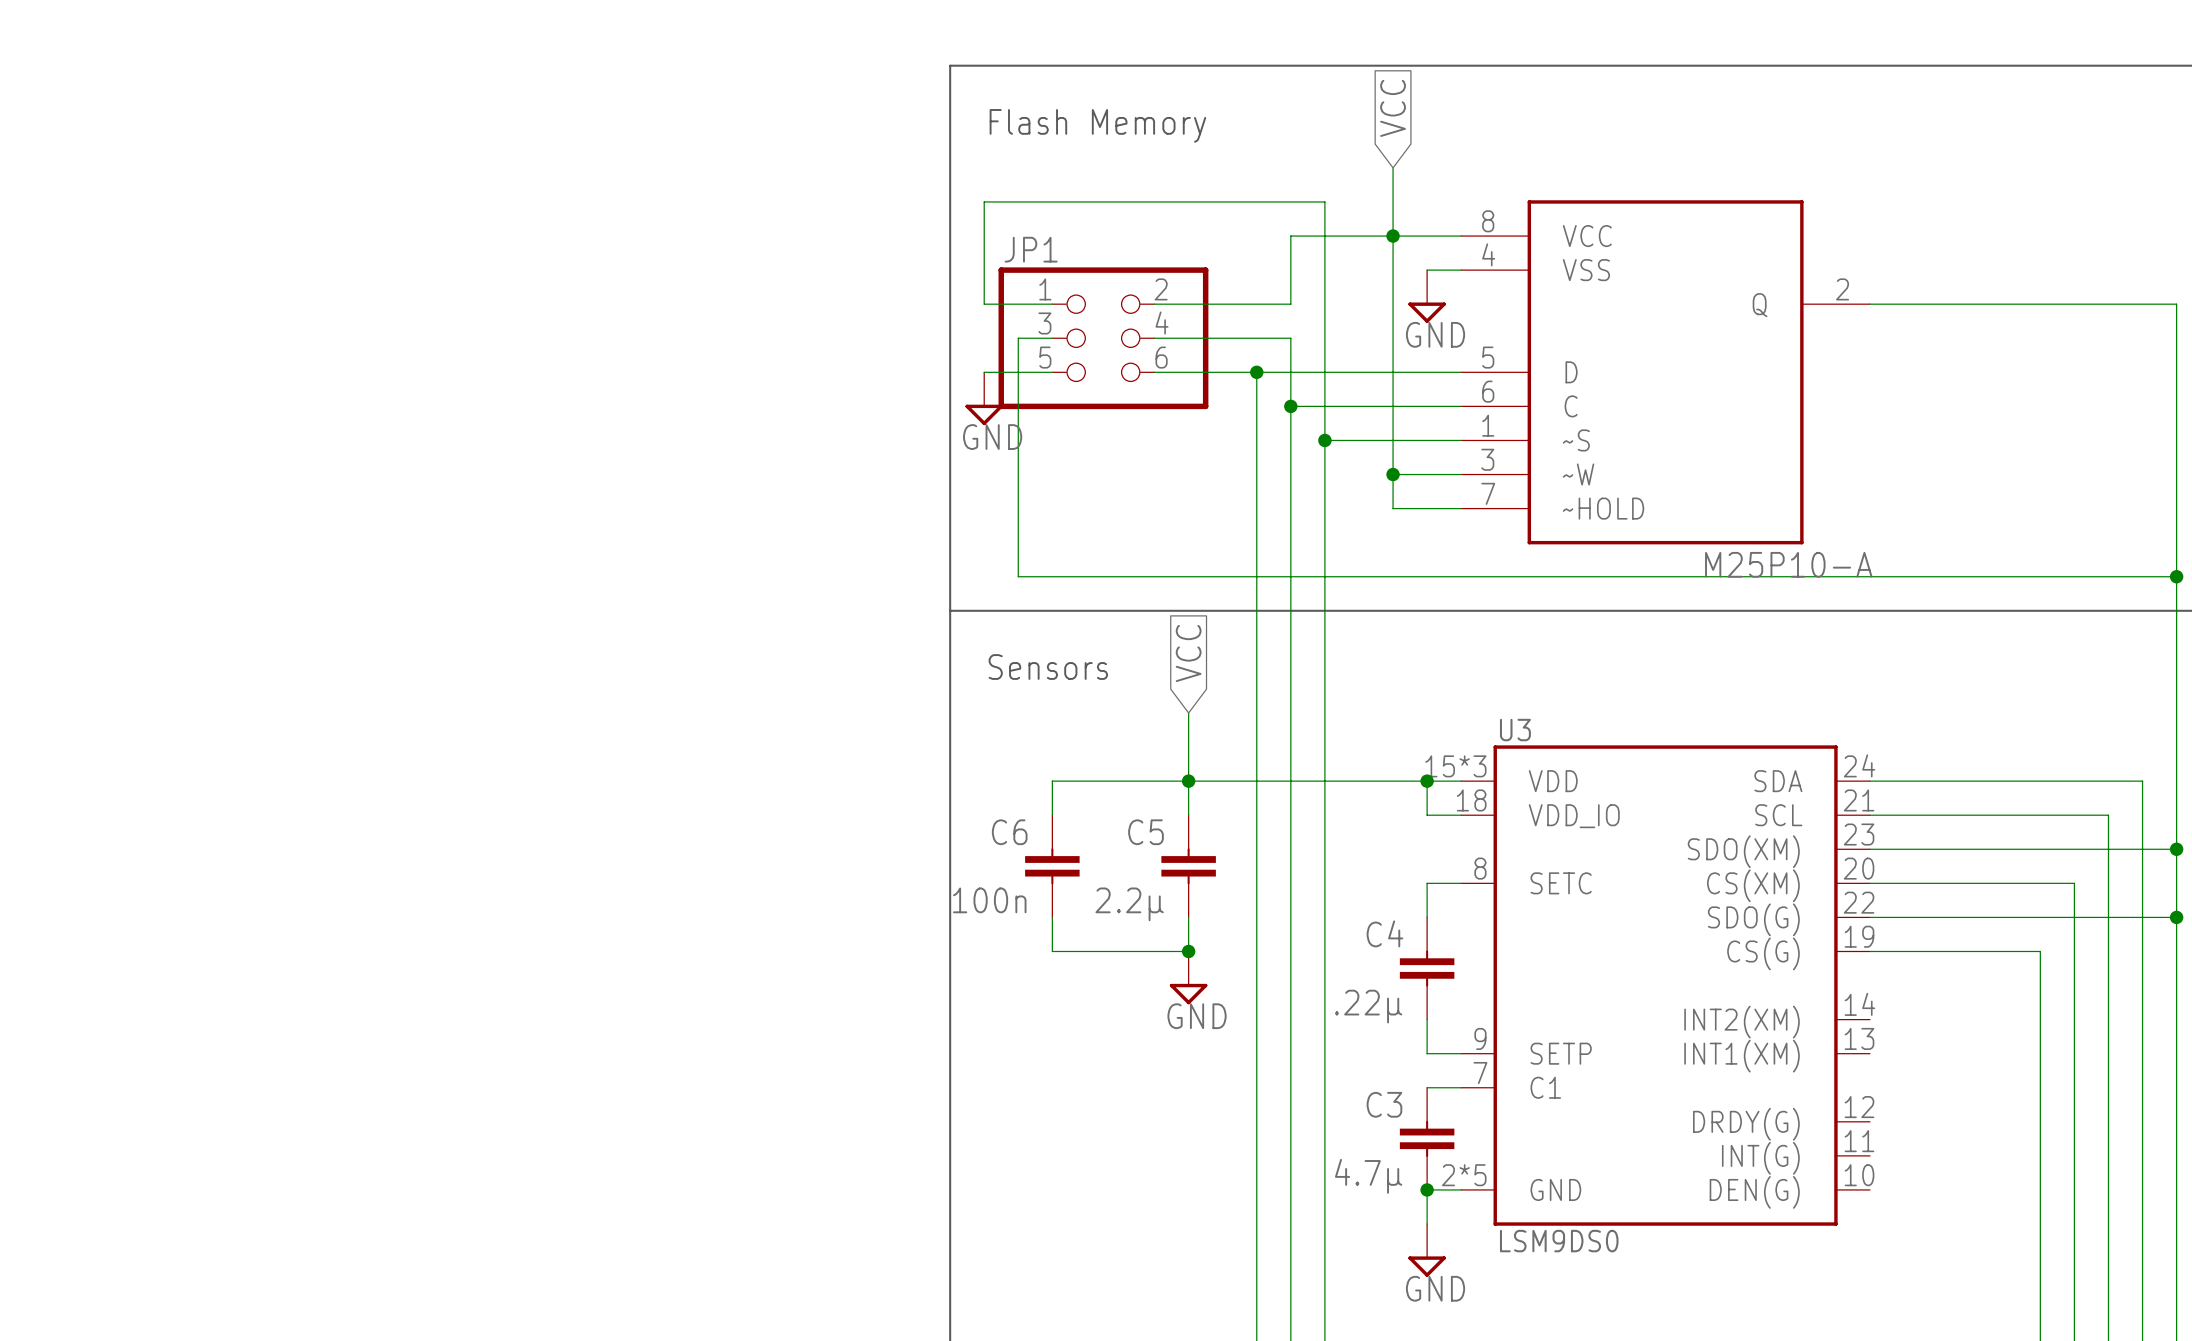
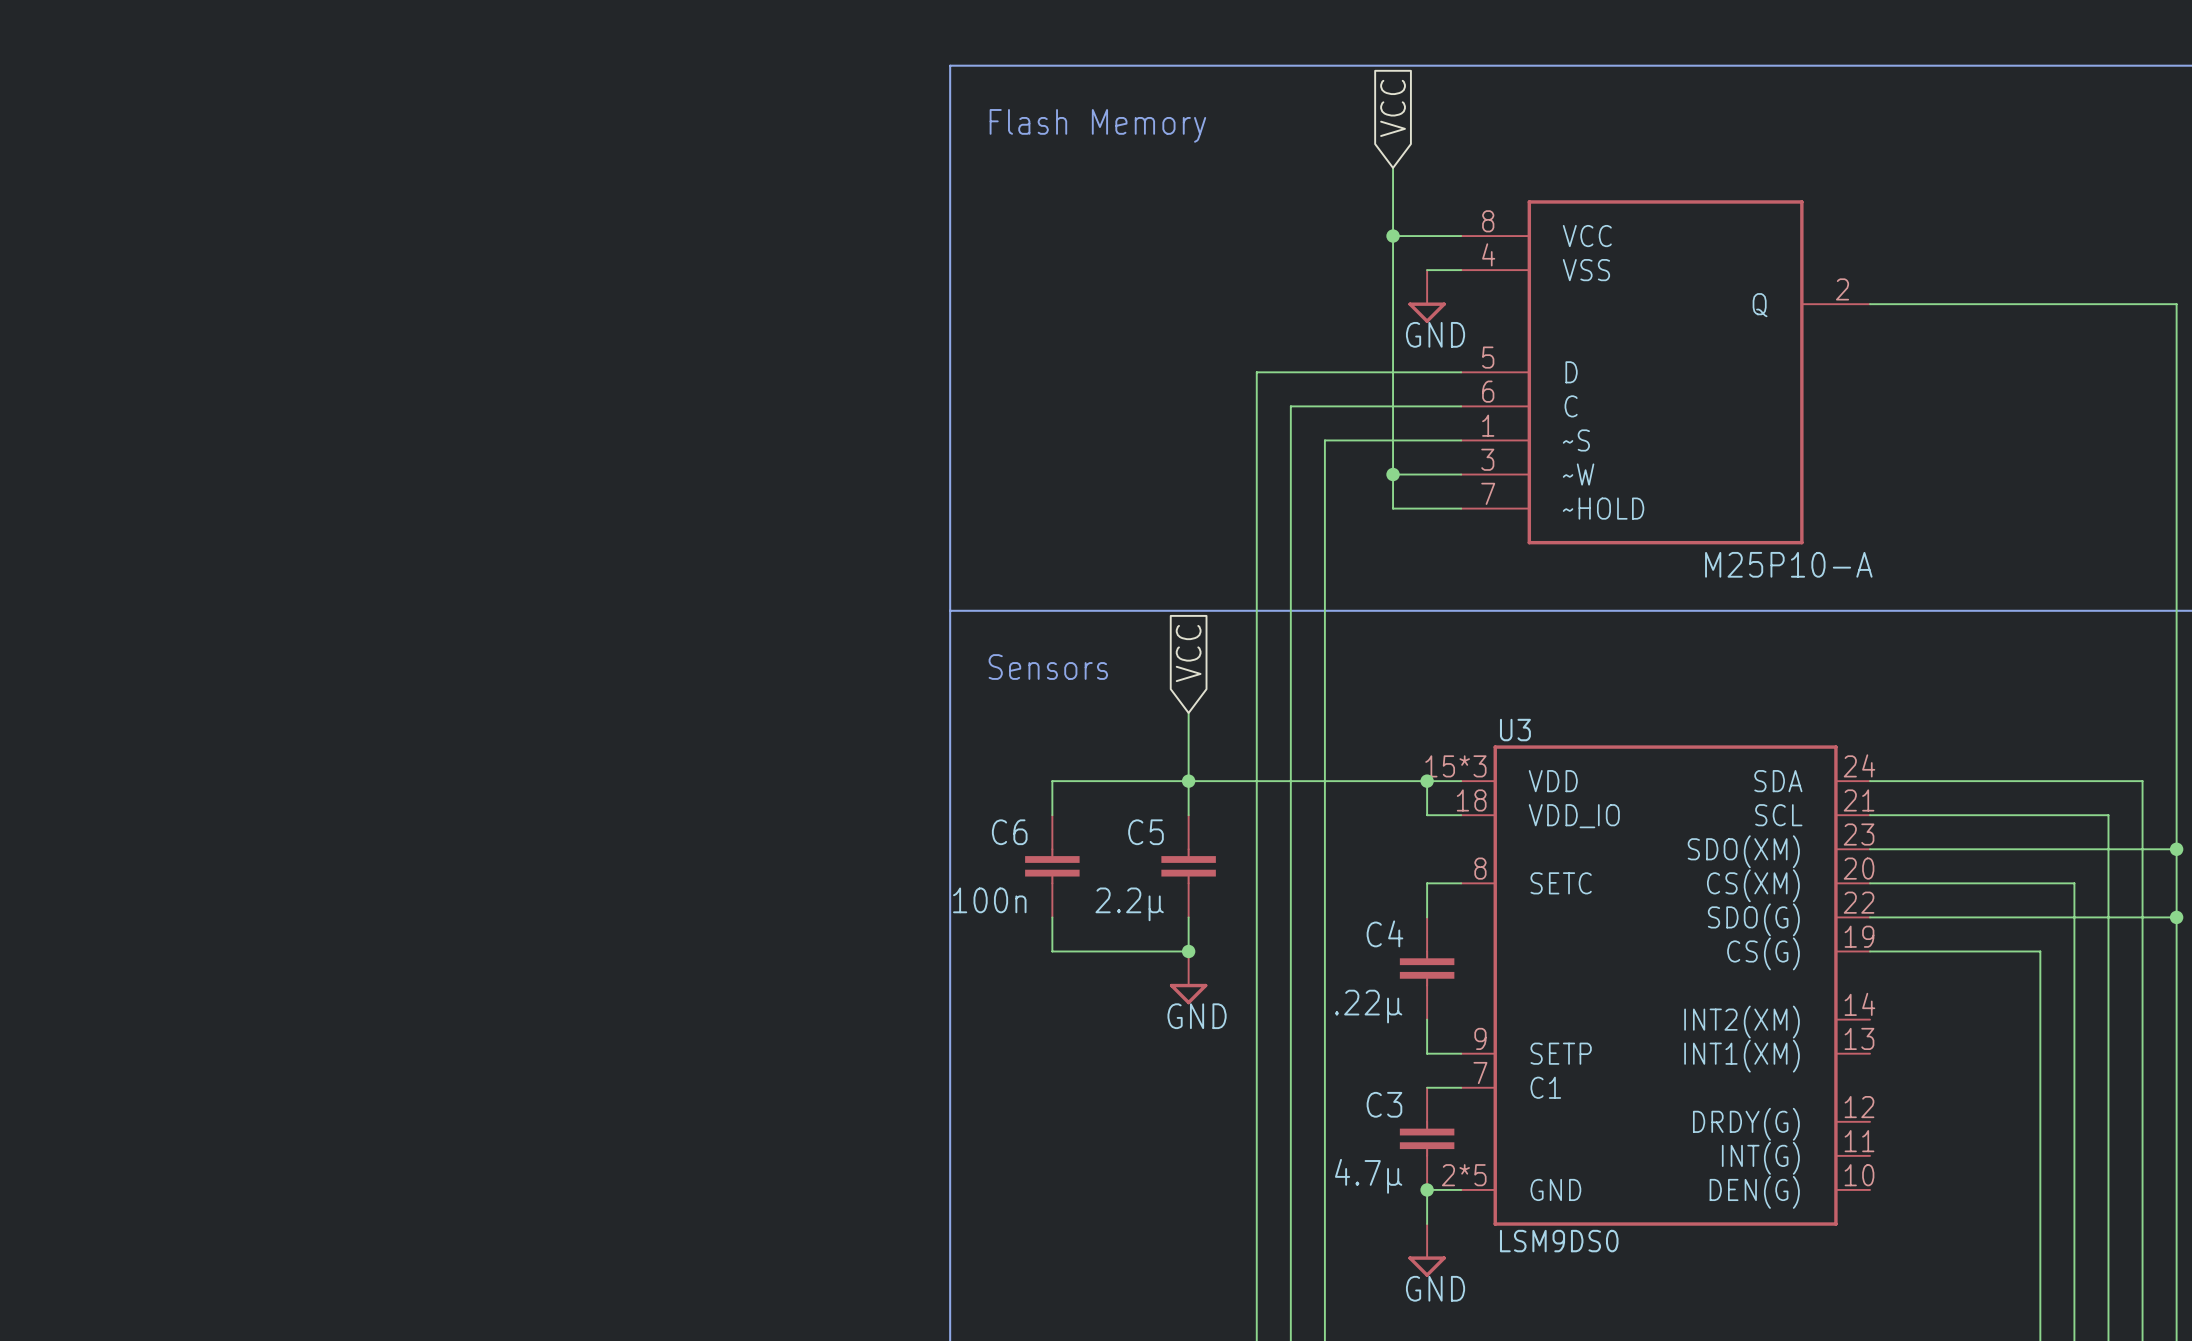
wire: (1393, 236) (1290, 236) (1290, 304) (1154, 304) -> none
wire: (1052, 304) (984, 304) (984, 201) (1324, 201) (1324, 440) -> none
wire: (1052, 338) (1018, 338) (1018, 576) (2176, 576) -> none
JP1: (1103, 338) -> none
wire: (1154, 338) (1290, 338) (1290, 406) -> none
wire: (984, 372) (1052, 372) -> none
wire: (1154, 372) (1256, 372) -> none
junction: (1256, 372) -> none
power symbol: GND (984, 398) -> none
junction: (1290, 406) -> none
junction: (1324, 440) -> none
junction: (2176, 576) -> none

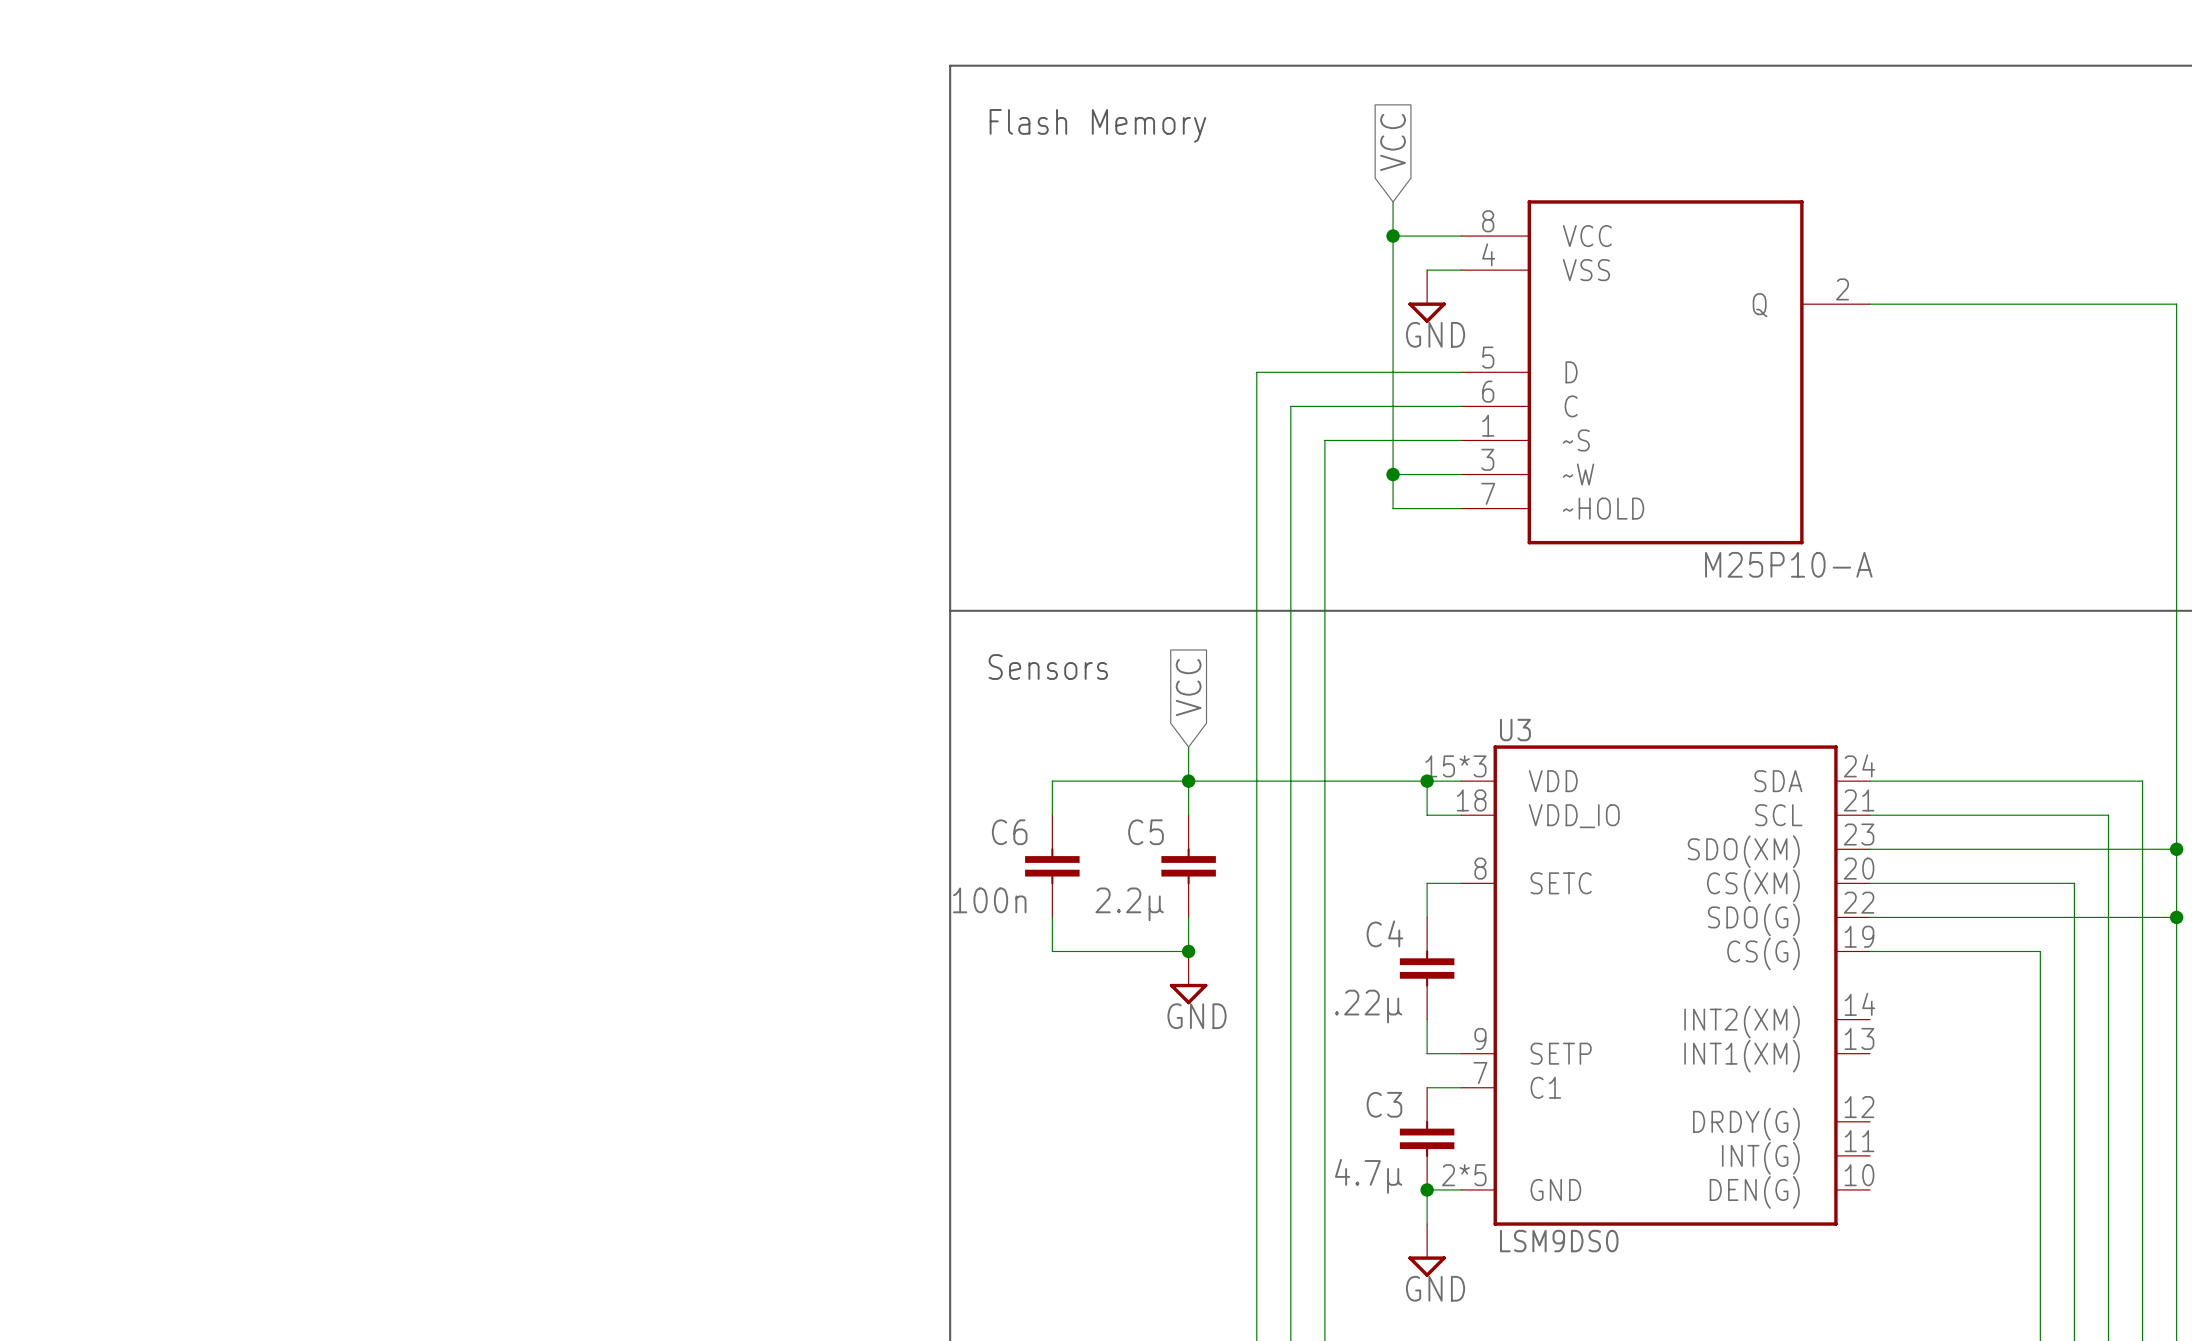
global label position: VCC (1393, 108) -> VCC (1393, 142)
wire: (1393, 167) (1393, 201) -> none
global label position: VCC (1188, 653) -> VCC (1188, 687)
wire: (1188, 713) (1188, 747) -> none

